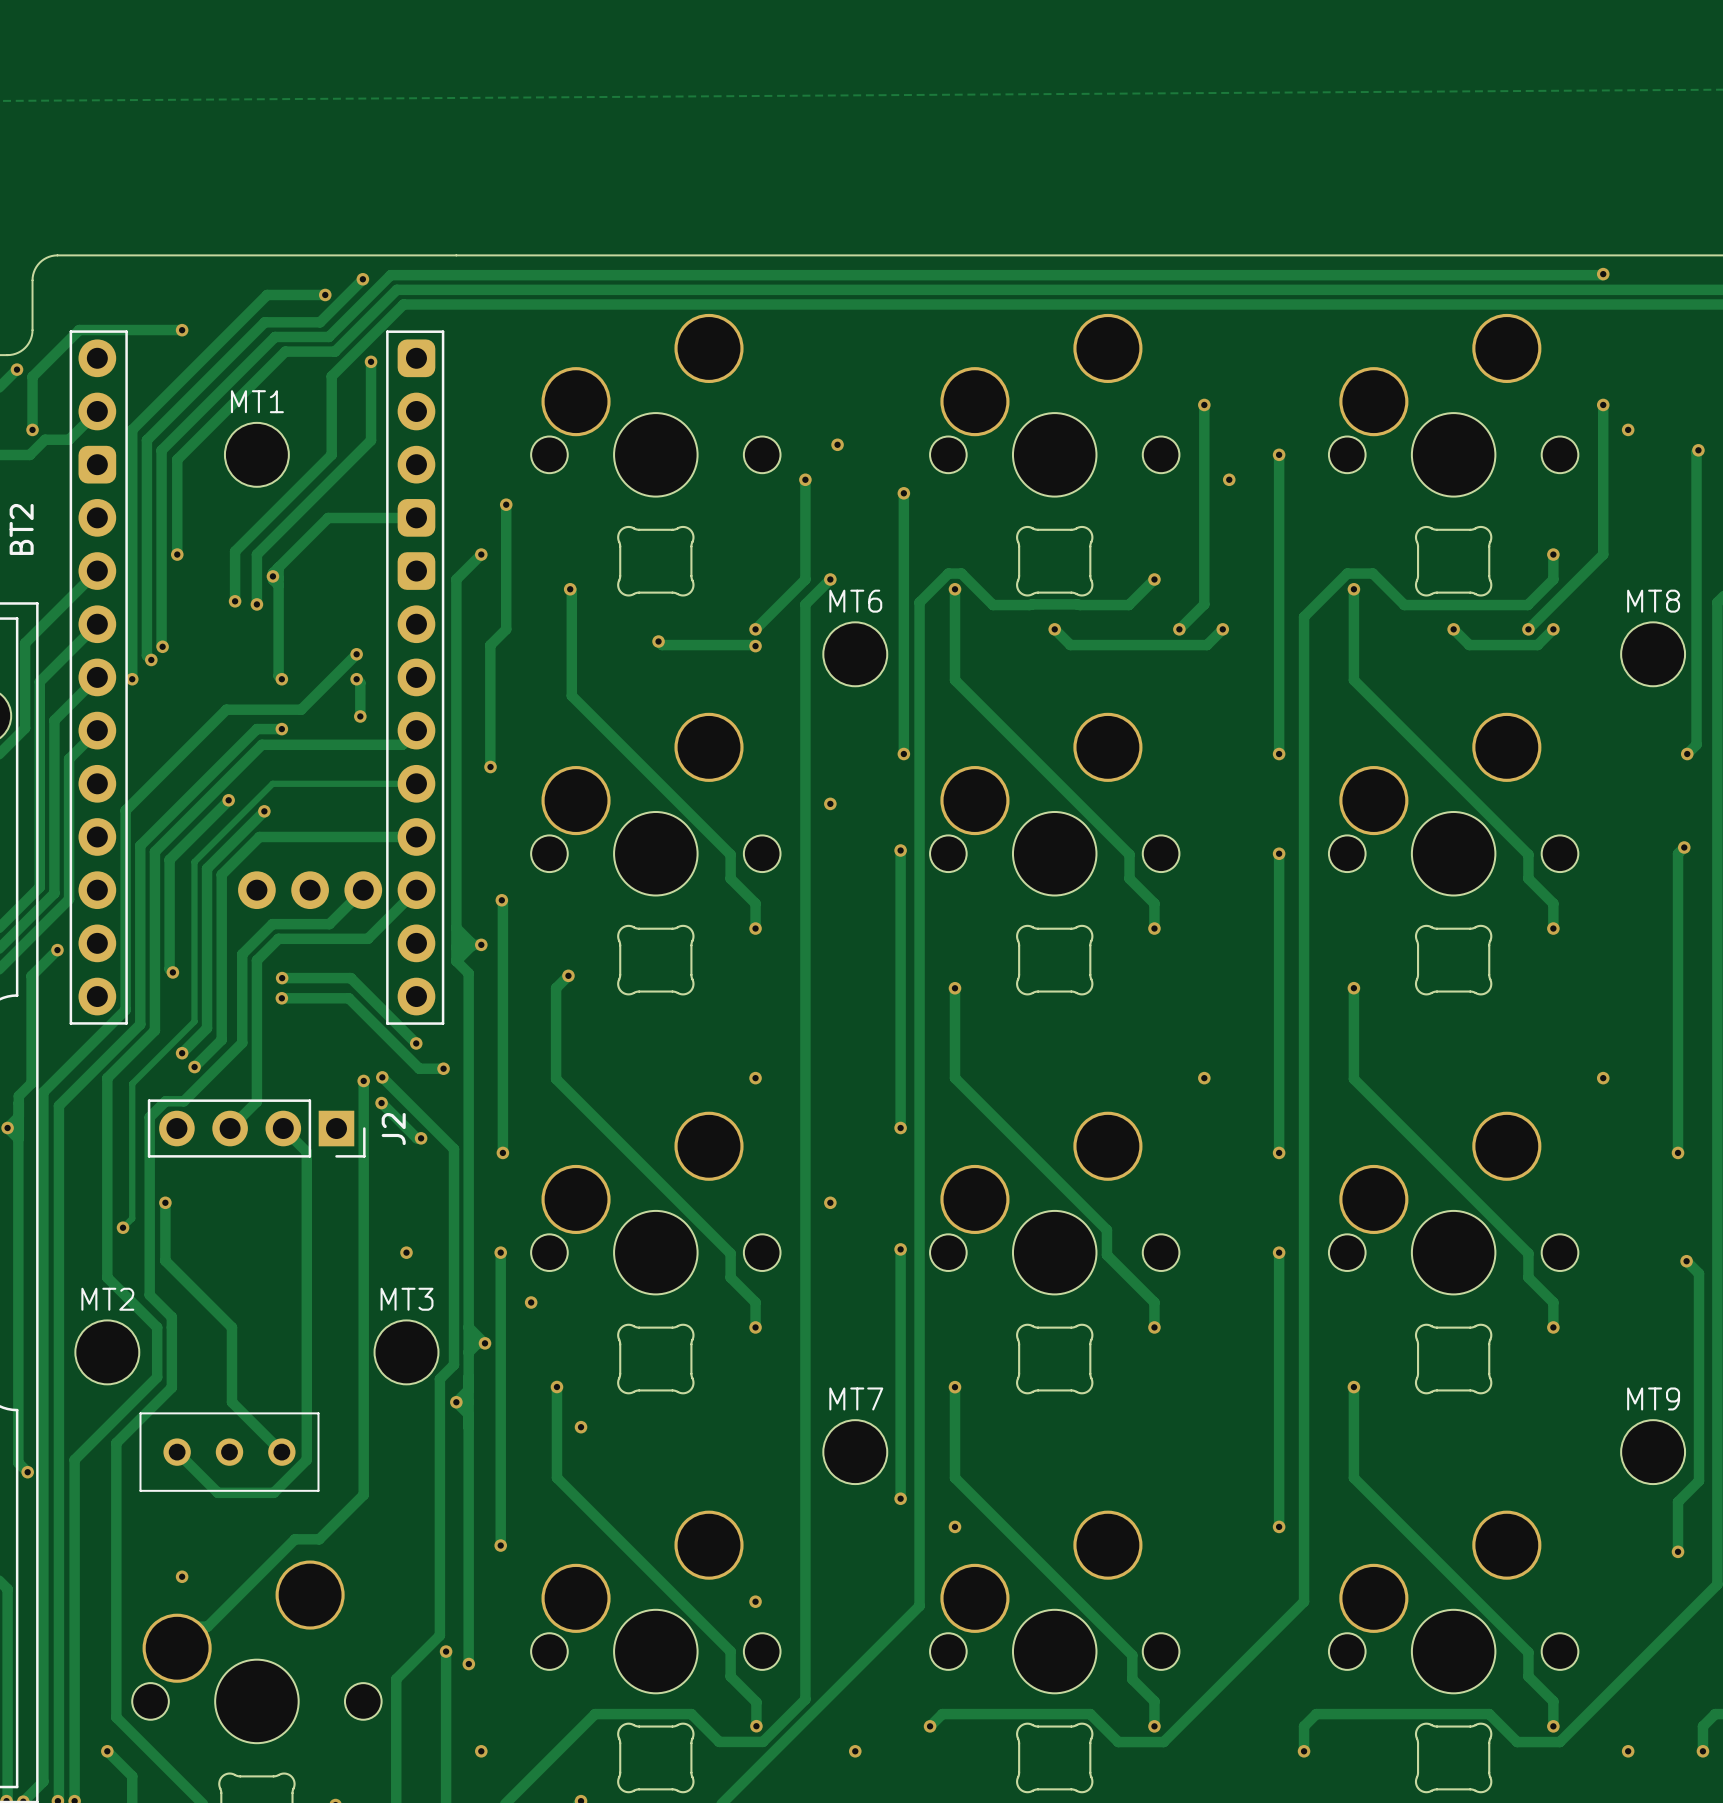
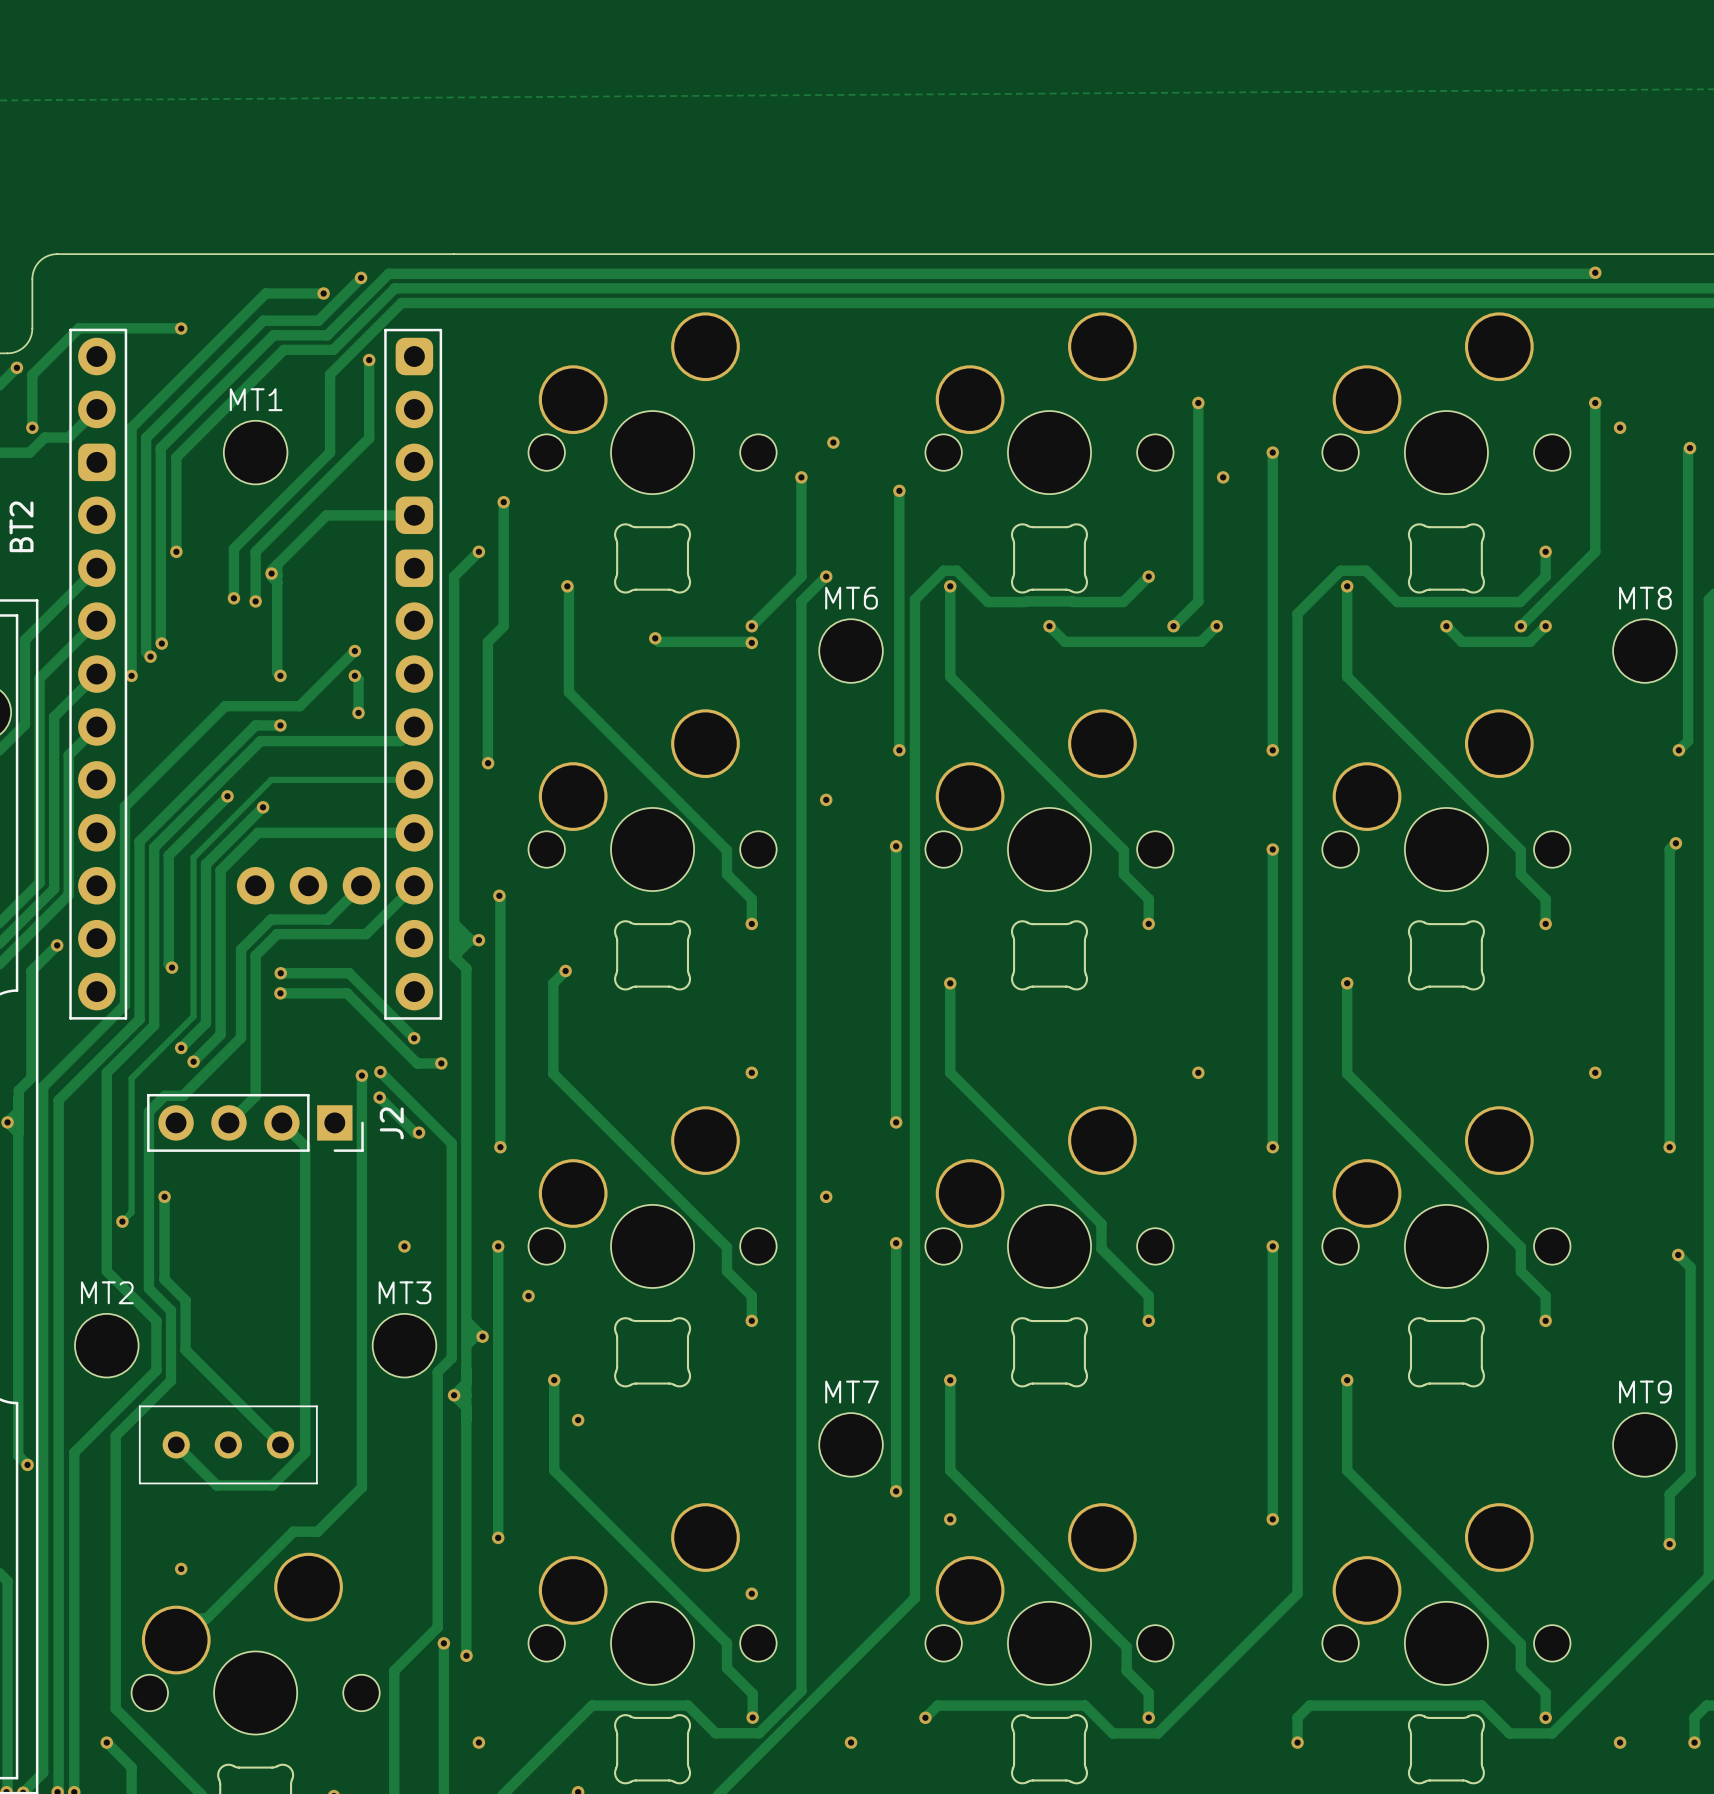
track: (165, 1260) (231, 1327) (231, 1402) -> (164, 1254) (164, 1279) (185, 1300) (185, 1350) (230, 1395)

